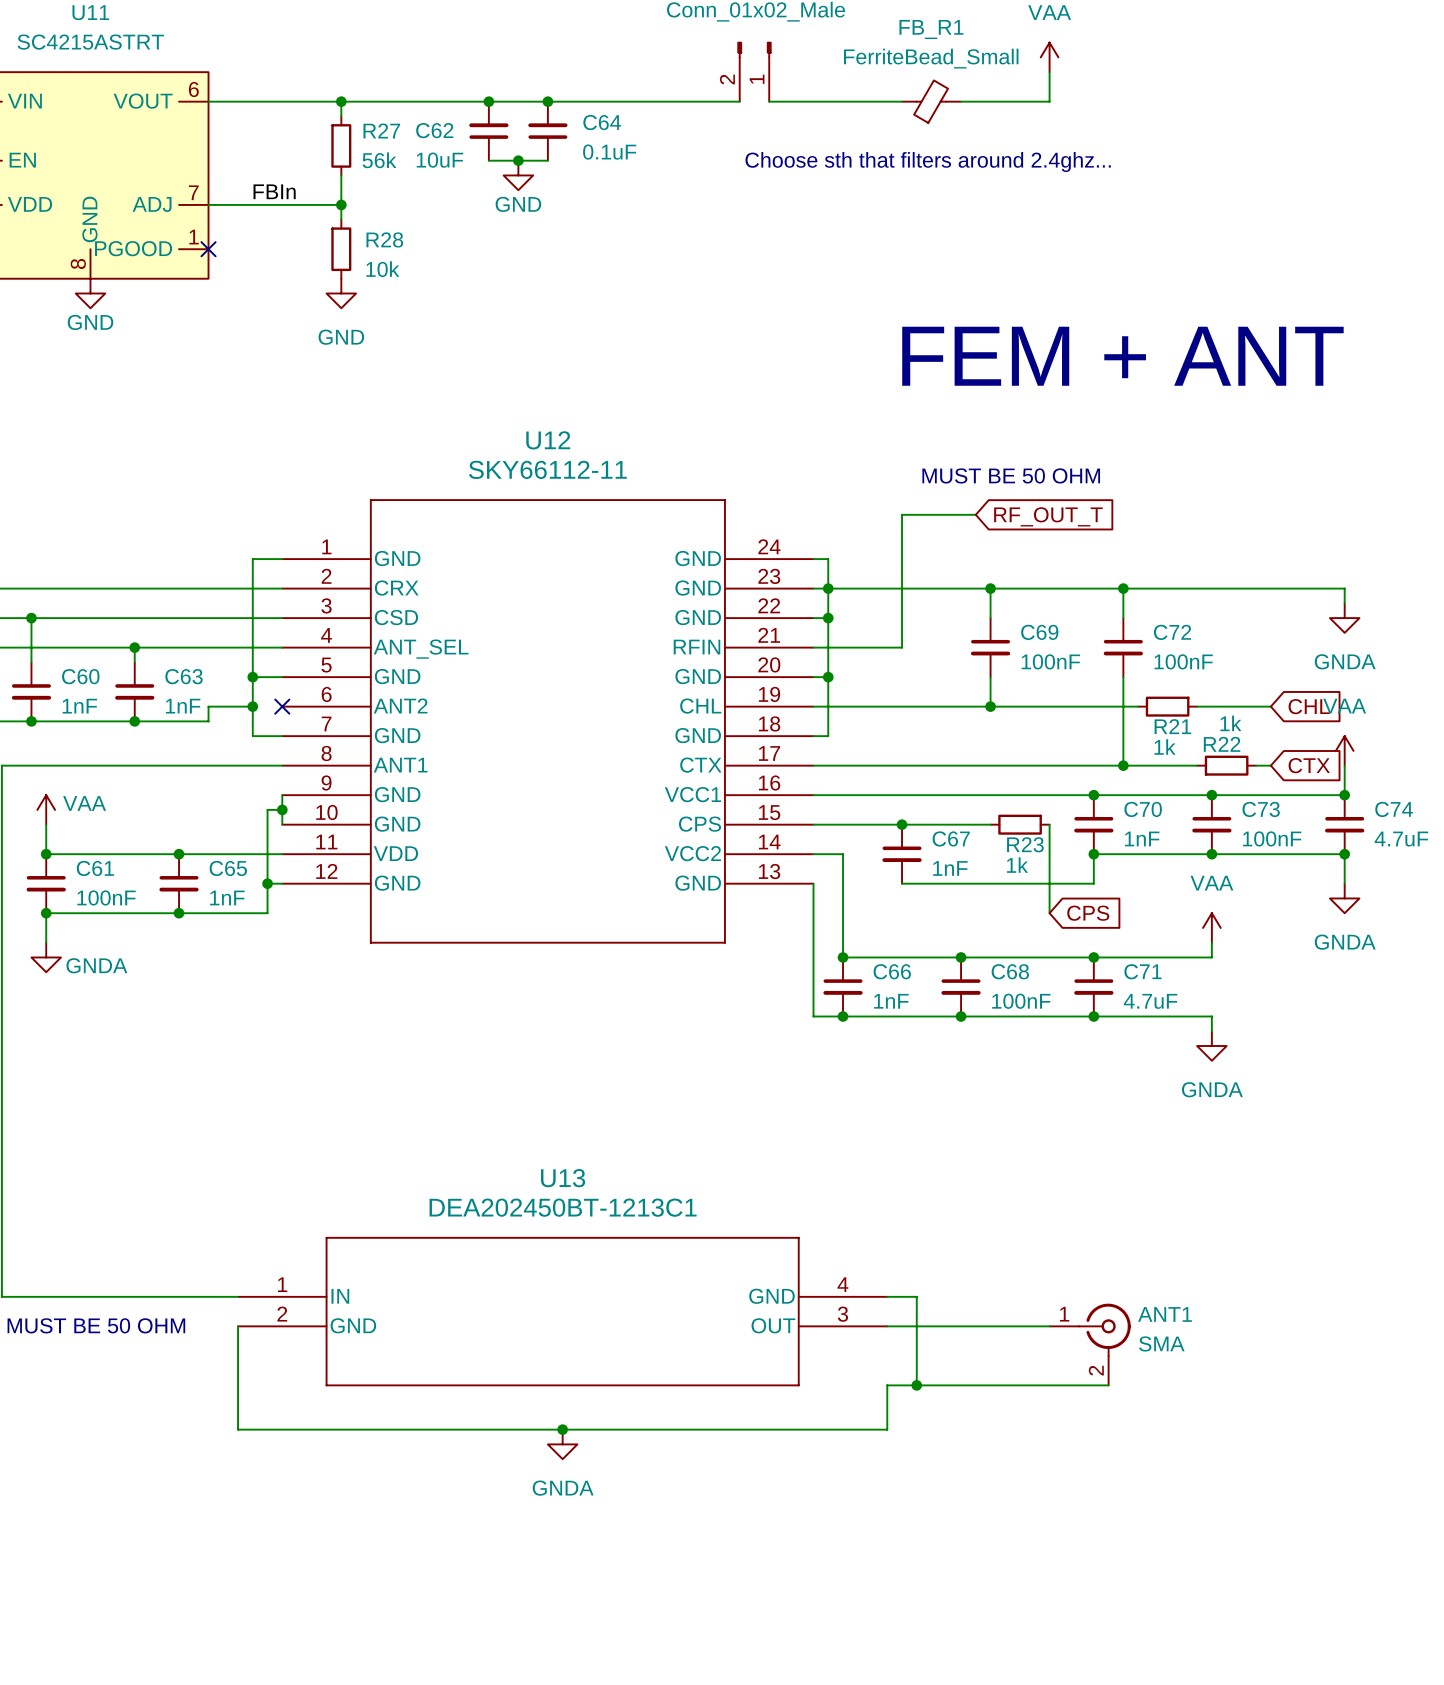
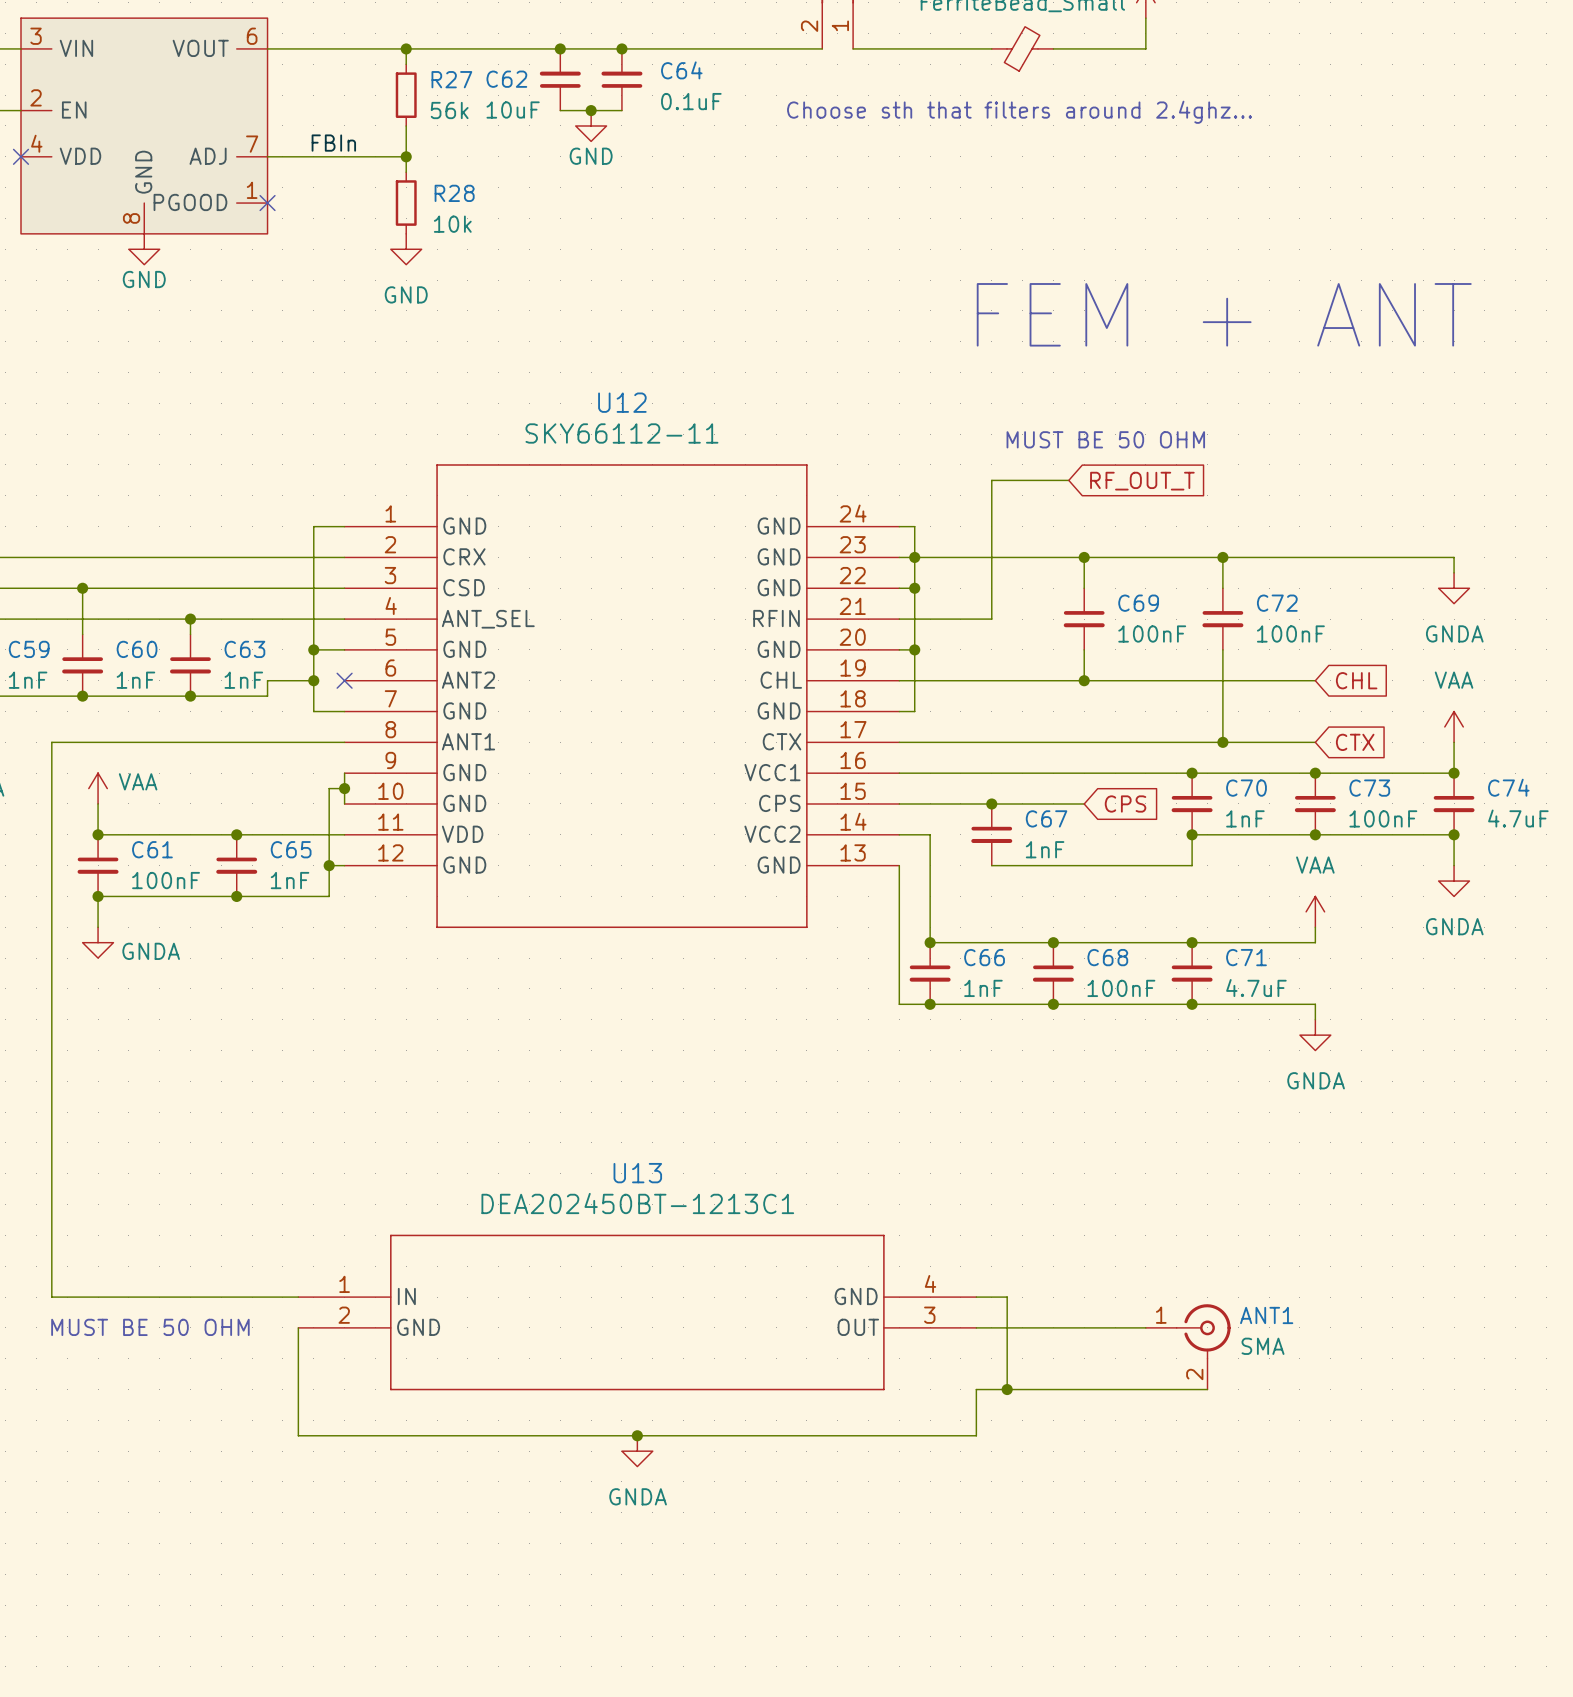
R21: 1k (1167, 706) -> none
wire: (1211, 706) (1270, 706) -> (1238, 680) (1299, 680)
global label position: CHL (1309, 706) -> CHL (1356, 680)
R22: 1k (1226, 765) -> none
global label position: CTX (1309, 765) -> CTX (1355, 742)
R23: 1k (1020, 824) -> none
wire: (1049, 824) (1049, 913) -> none
global label position: CPS (1088, 913) -> CPS (1125, 803)

